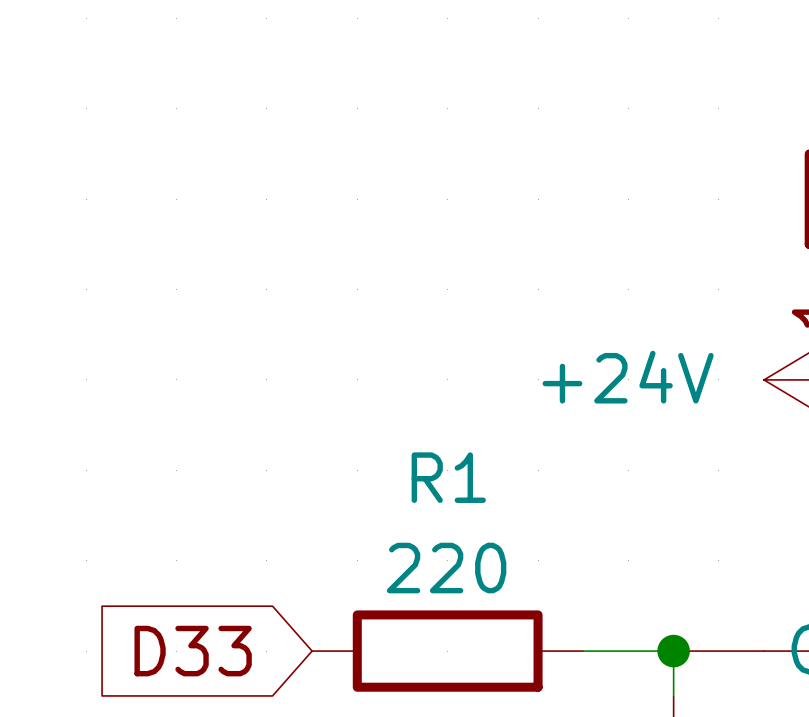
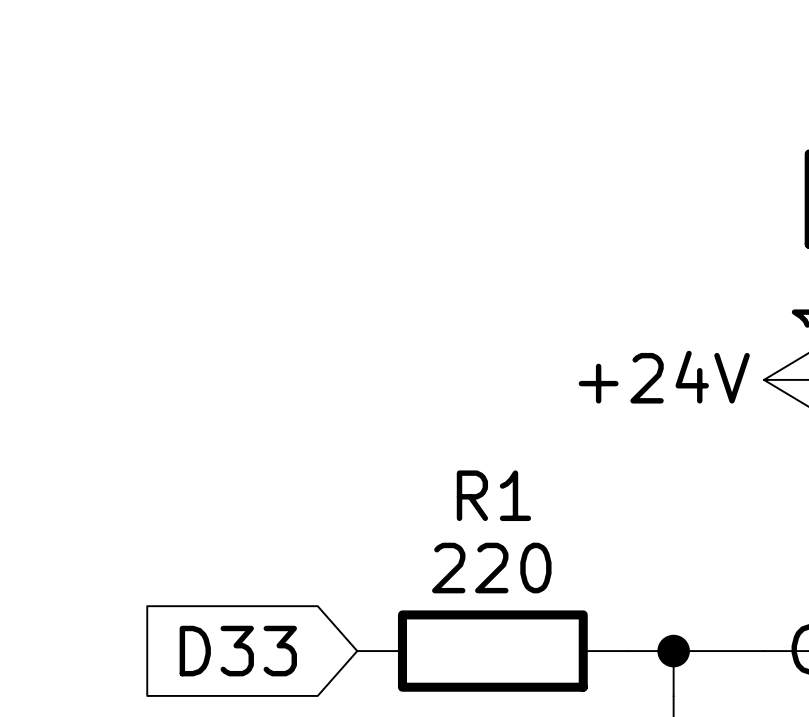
power symbol text position: +24V (628, 377) -> +24V (664, 377)
R1 name position: R1 (448, 477) -> R1 (493, 495)
global label position: D33 (193, 651) -> D33 (238, 651)
R1 position: (447, 651) -> (492, 651)

